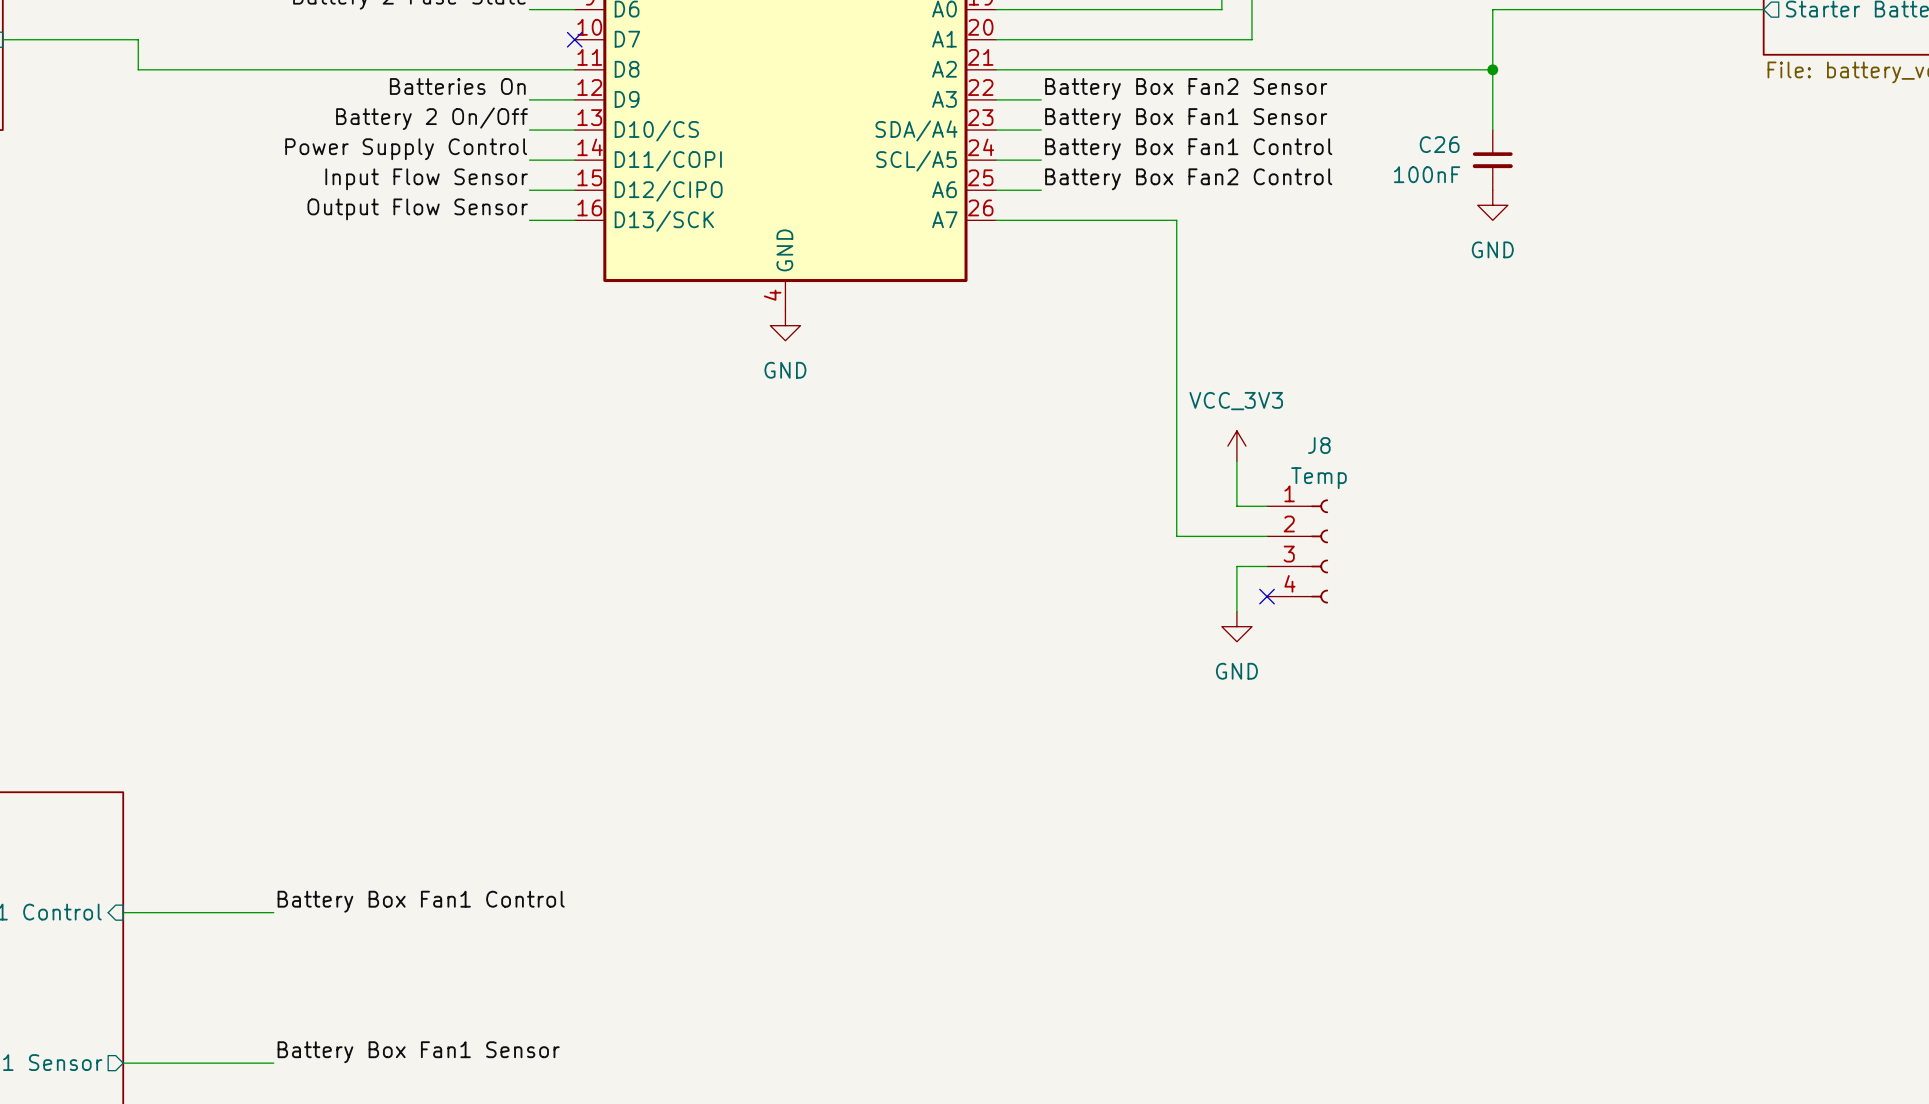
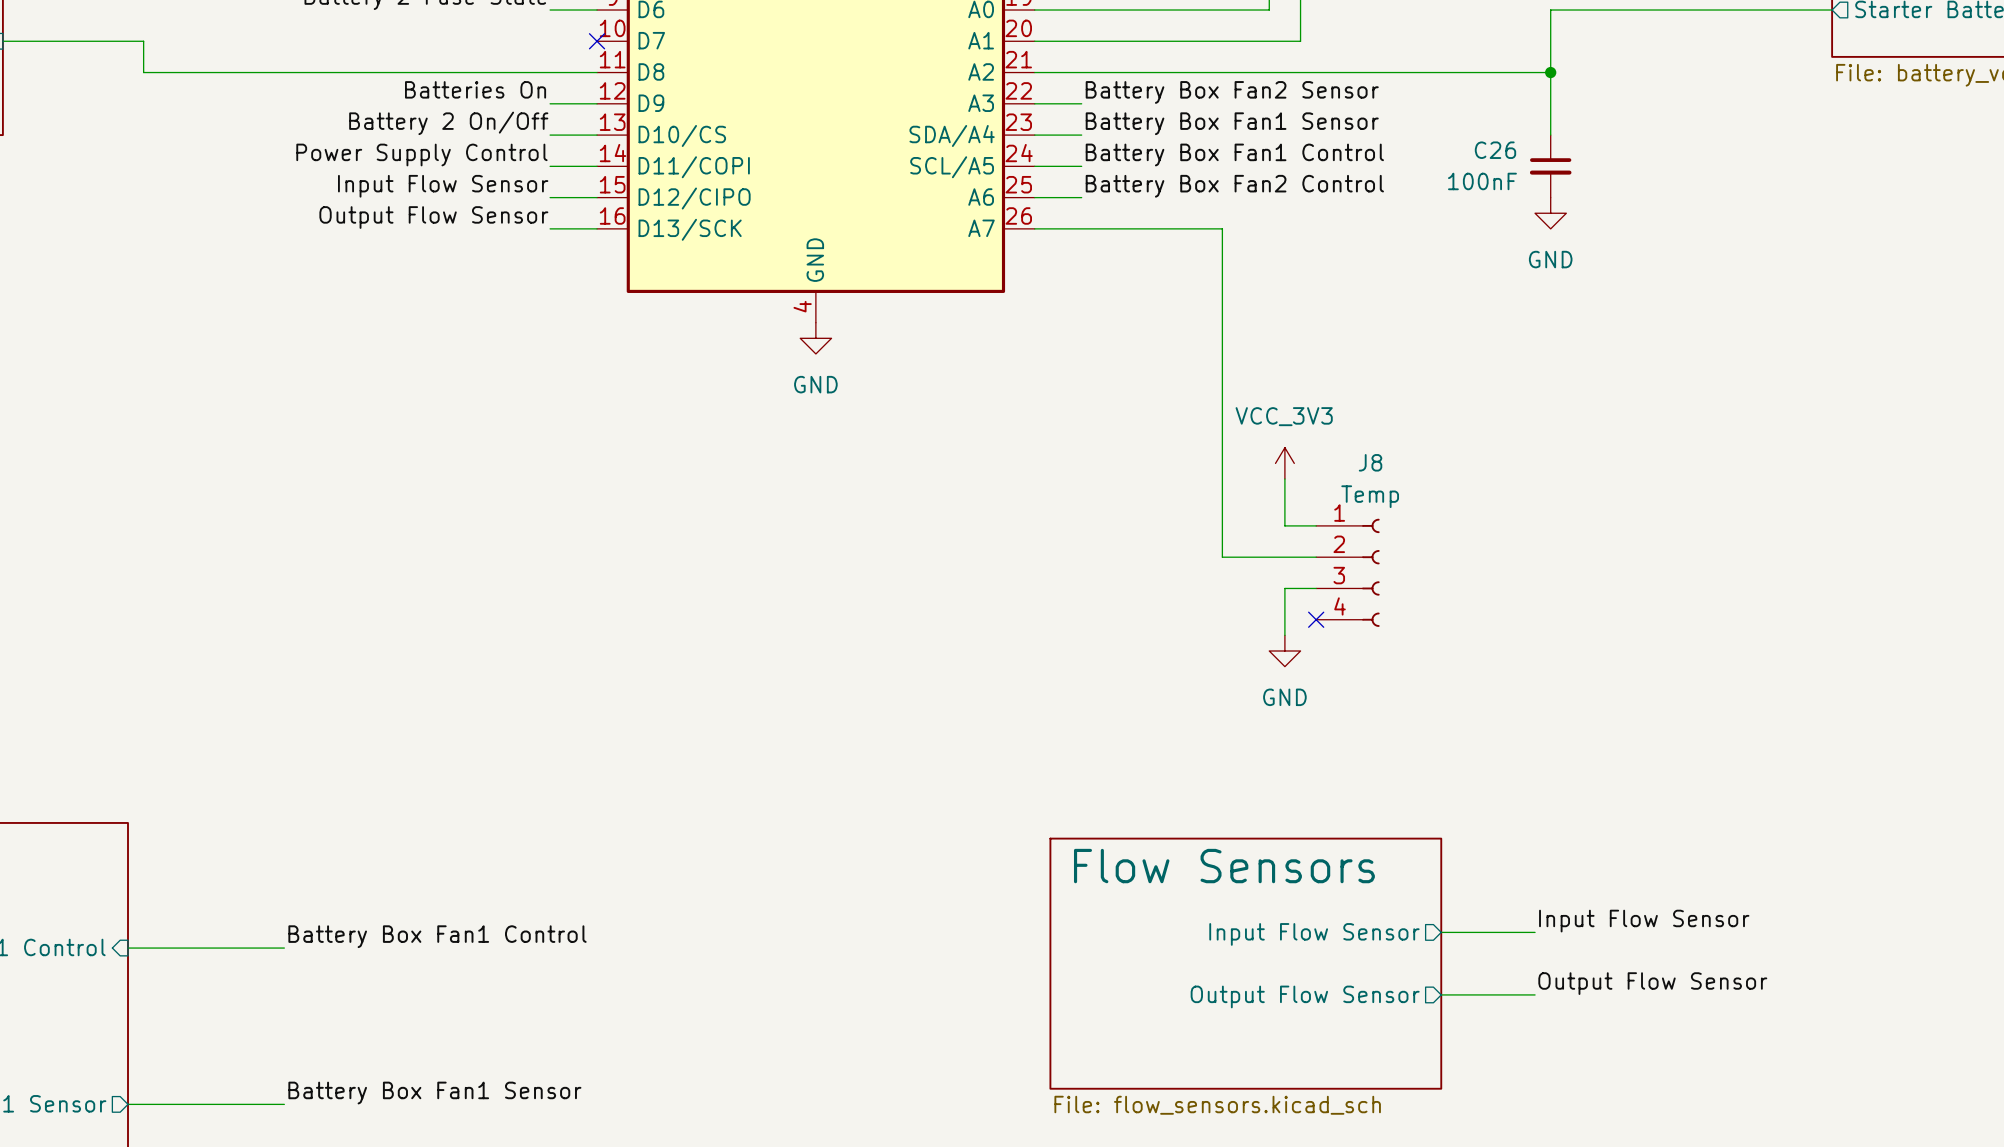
label: none -> Input Flow Sensor (1644, 921)
wire: none -> (1441, 932) (1535, 932)
sheet pin: none -> Input Flow Sensor (1314, 934)
sheet Flow Sensors: none -> File: flow_sensors.kicad_sch (1245, 963)
label: none -> Output Flow Sensor (1652, 983)
wire: none -> (1441, 994) (1535, 994)
sheet pin: none -> Output Flow Sensor (1305, 996)

